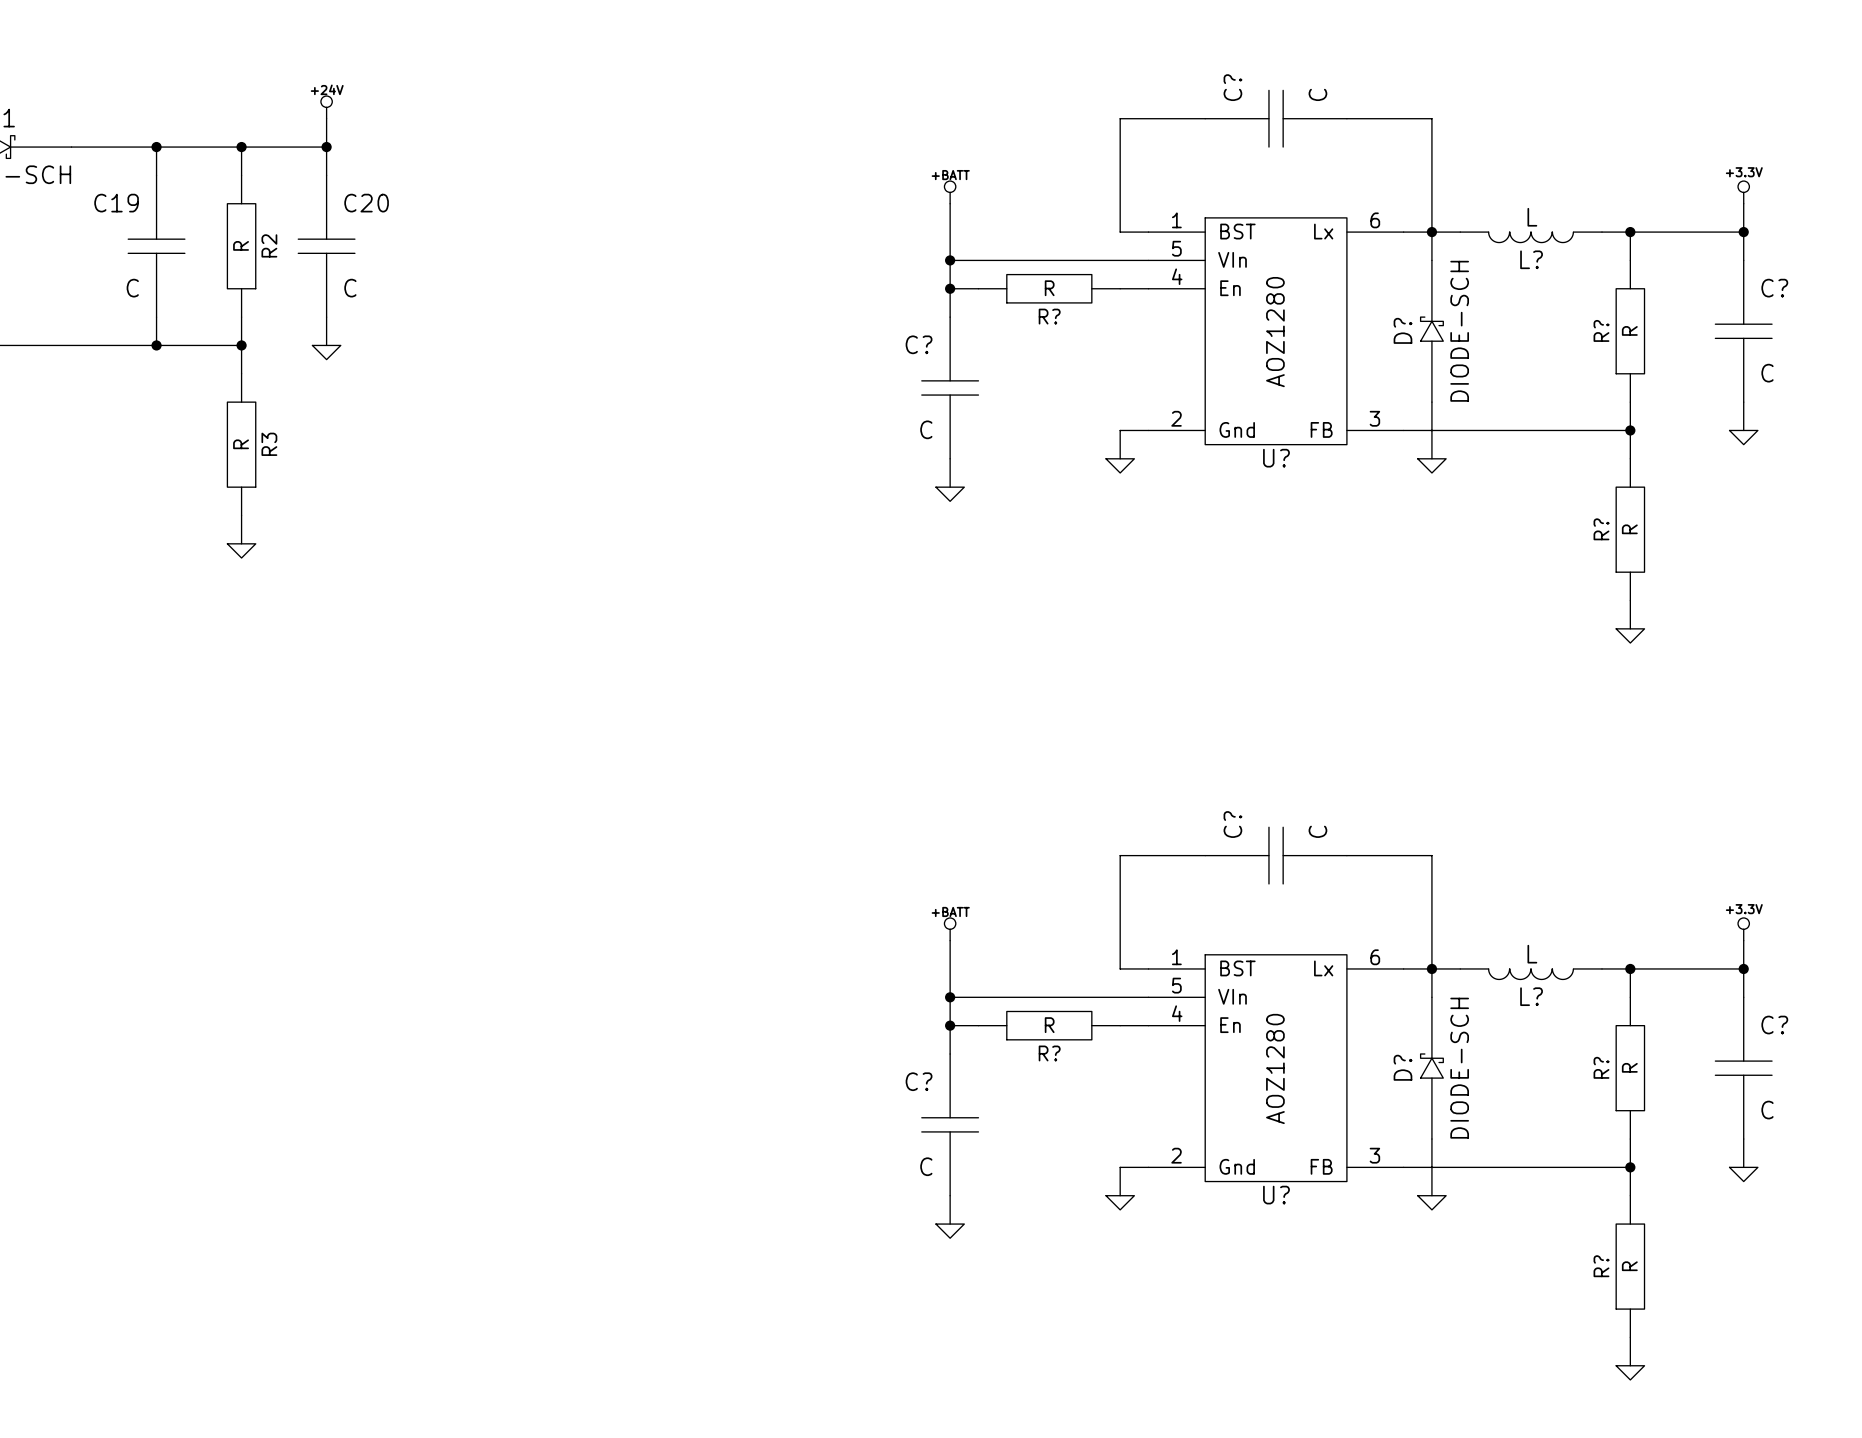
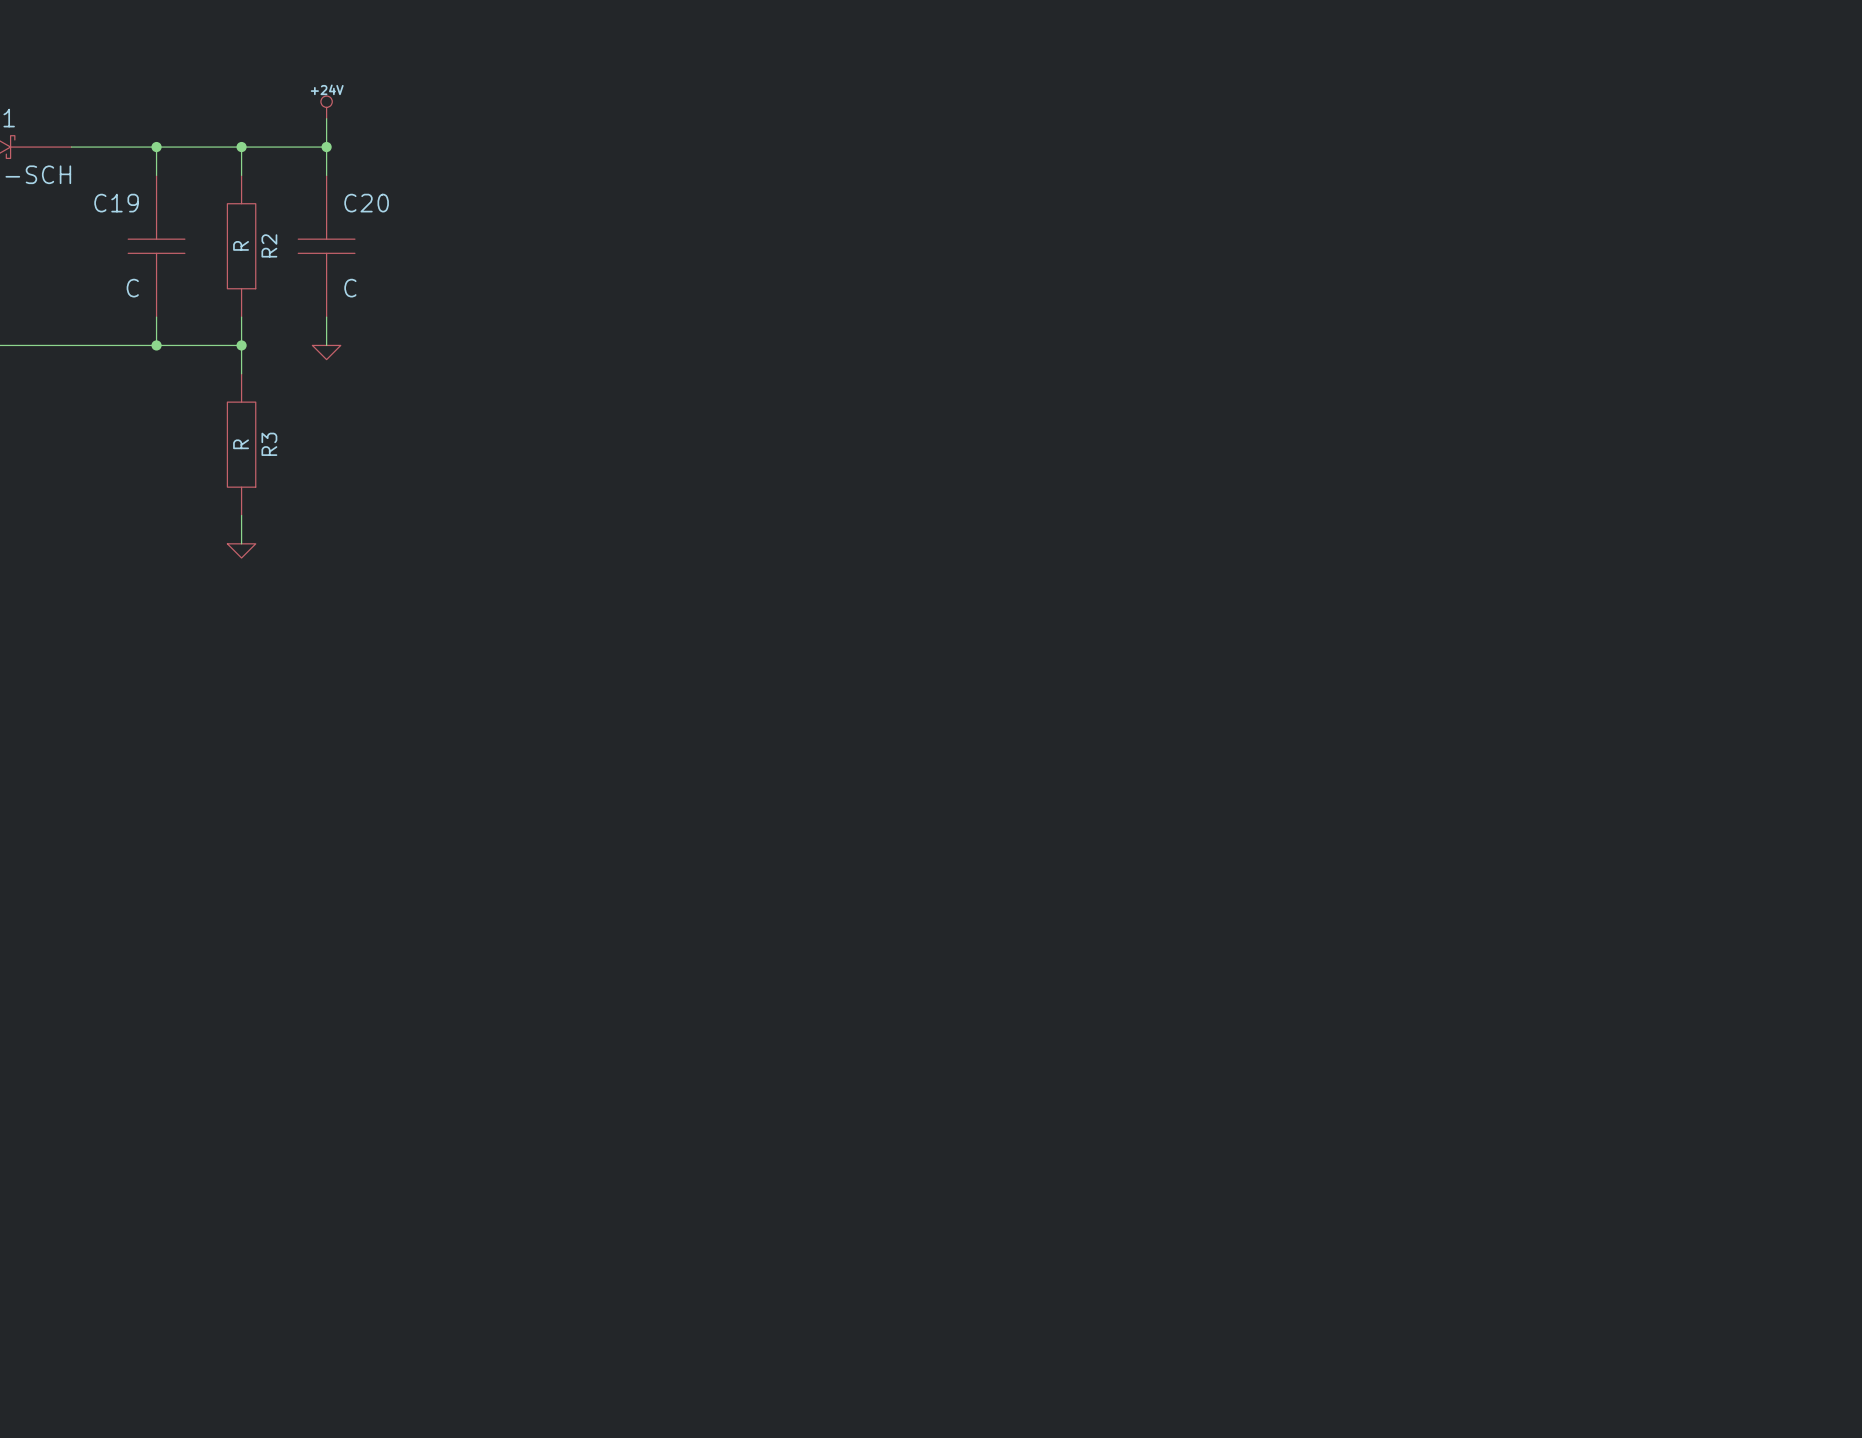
wire: (1205, 118) (1120, 118) (1120, 232) (1148, 232) -> none
C?: C (1276, 118) -> none
wire: (1346, 118) (1431, 118) (1431, 260) -> none
power symbol: +BATT (950, 192) -> none
power symbol: +3.3V (1743, 192) -> none
wire: (950, 203) (950, 317) -> none
wire: (1743, 203) (1743, 260) -> none
wire: (1403, 232) (1460, 232) -> none
junction: (1431, 232) -> none
wire: (1602, 232) (1743, 232) -> none
wire: (1630, 232) (1630, 260) -> none
junction: (1630, 232) -> none
junction: (1743, 232) -> none
L?: L (1531, 237) -> none
wire: (950, 260) (1148, 260) -> none
junction: (950, 260) -> none
wire: (950, 288) (978, 288) -> none
junction: (950, 288) -> none
R?: R (1049, 288) -> none
wire: (1120, 288) (1148, 288) -> none
U?: AOZ1280 (1276, 331) -> none
D?: DIODE-SCH (1431, 331) -> none
R?: R (1630, 331) -> none
C?: C (1743, 331) -> none
C?: C (950, 387) -> none
wire: (1431, 402) (1431, 458) -> none
wire: (1630, 402) (1630, 458) -> none
wire: (1743, 402) (1743, 430) -> none
wire: (1148, 430) (1120, 430) (1120, 458) -> none
wire: (1403, 430) (1630, 430) -> none
junction: (1630, 430) -> none
power symbol: (1743, 437) -> none
wire: (950, 458) (950, 487) -> none
power symbol: (1120, 465) -> none
power symbol: (1431, 465) -> none
power symbol: (950, 494) -> none
R?: R (1630, 529) -> none
wire: (1630, 600) (1630, 628) -> none
power symbol: (1630, 635) -> none
wire: (1205, 855) (1120, 855) (1120, 968) (1148, 968) -> none
C?: C (1276, 855) -> none
wire: (1346, 855) (1431, 855) (1431, 997) -> none
power symbol: +BATT (950, 929) -> none
power symbol: +3.3V (1743, 929) -> none
wire: (950, 940) (950, 1054) -> none
wire: (1743, 940) (1743, 997) -> none
wire: (1403, 968) (1460, 968) -> none
junction: (1431, 968) -> none
wire: (1602, 968) (1743, 968) -> none
wire: (1630, 968) (1630, 997) -> none
junction: (1630, 968) -> none
junction: (1743, 968) -> none
L?: L (1531, 974) -> none
wire: (950, 997) (1148, 997) -> none
junction: (950, 997) -> none
wire: (950, 1025) (978, 1025) -> none
junction: (950, 1025) -> none
R?: R (1049, 1025) -> none
wire: (1120, 1025) (1148, 1025) -> none
U?: AOZ1280 (1276, 1068) -> none
D?: DIODE-SCH (1431, 1068) -> none
R?: R (1630, 1068) -> none
C?: C (1743, 1068) -> none
C?: C (950, 1124) -> none
wire: (1431, 1139) (1431, 1195) -> none
wire: (1630, 1139) (1630, 1195) -> none
wire: (1743, 1139) (1743, 1167) -> none
wire: (1148, 1167) (1120, 1167) (1120, 1195) -> none
wire: (1403, 1167) (1630, 1167) -> none
junction: (1630, 1167) -> none
power symbol: (1743, 1174) -> none
wire: (950, 1195) (950, 1224) -> none
power symbol: (1120, 1202) -> none
power symbol: (1431, 1202) -> none
power symbol: (950, 1231) -> none
R?: R (1630, 1266) -> none
wire: (1630, 1337) (1630, 1365) -> none
power symbol: (1630, 1372) -> none

